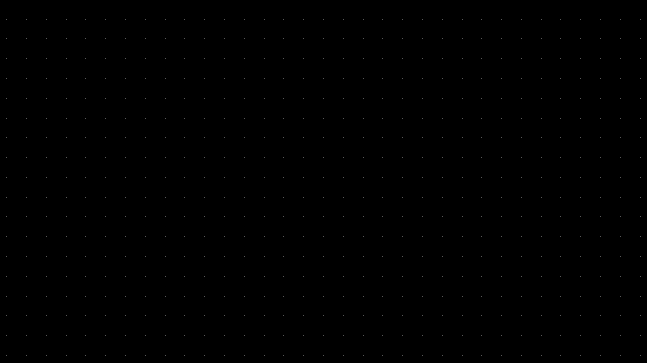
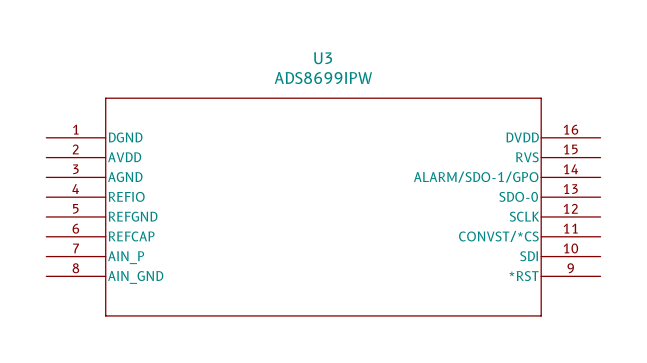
U3: none -> ADS8699IPW (323, 207)

